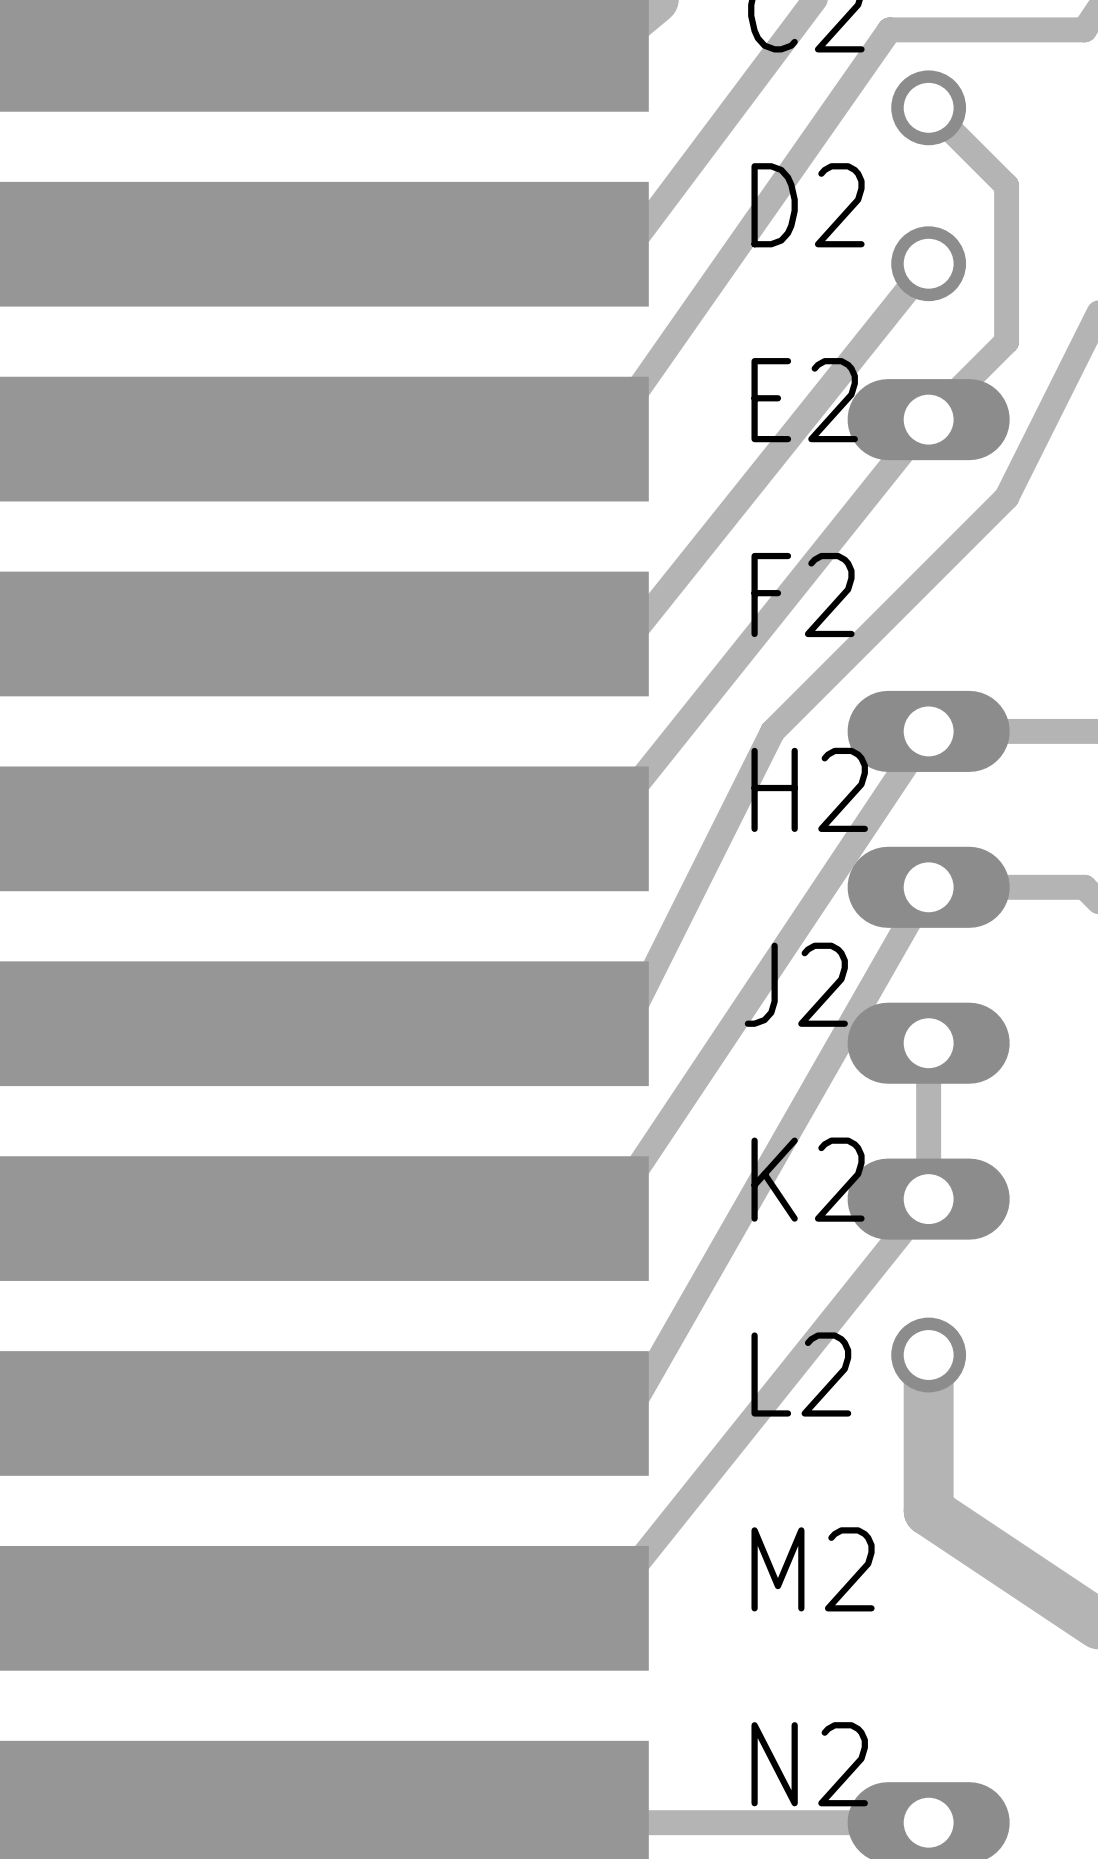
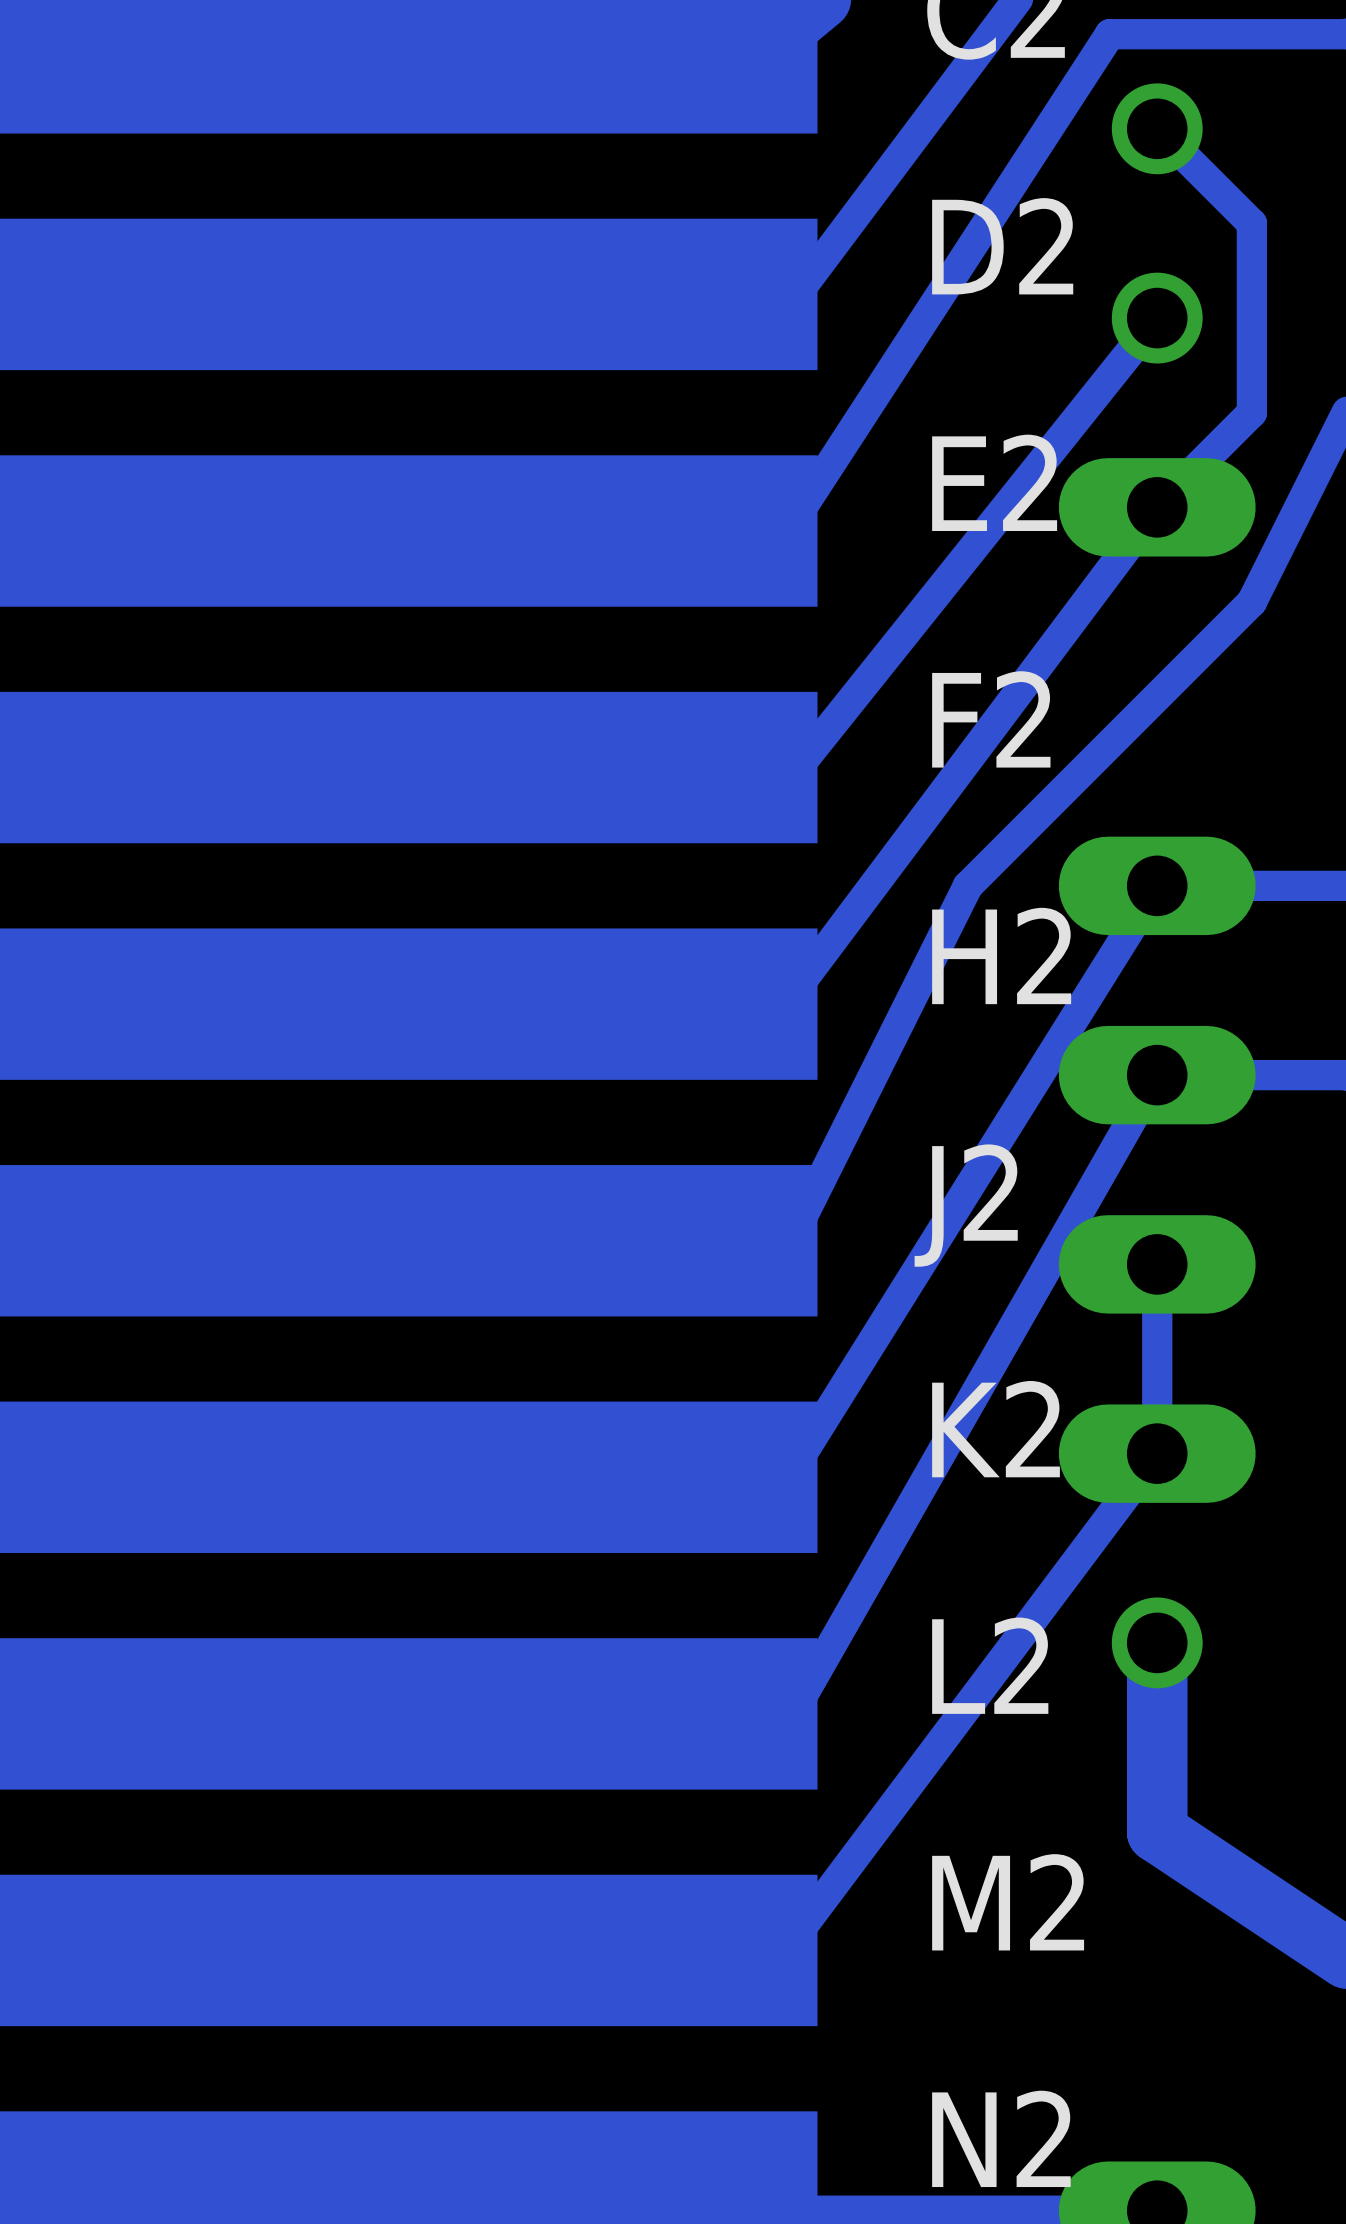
track: (889, 29) (616, 419) (246, 439) -> (1109, 34) (802, 507) (329, 531)
track: (928, 419) (616, 809) (246, 828) -> (1157, 507) (802, 980) (329, 1004)
track: (928, 731) (616, 1199) (246, 1218) -> (1157, 885) (802, 1453) (329, 1477)
track: (928, 1199) (616, 1588) (246, 1608) -> (1157, 1453) (802, 1926) (329, 1950)

